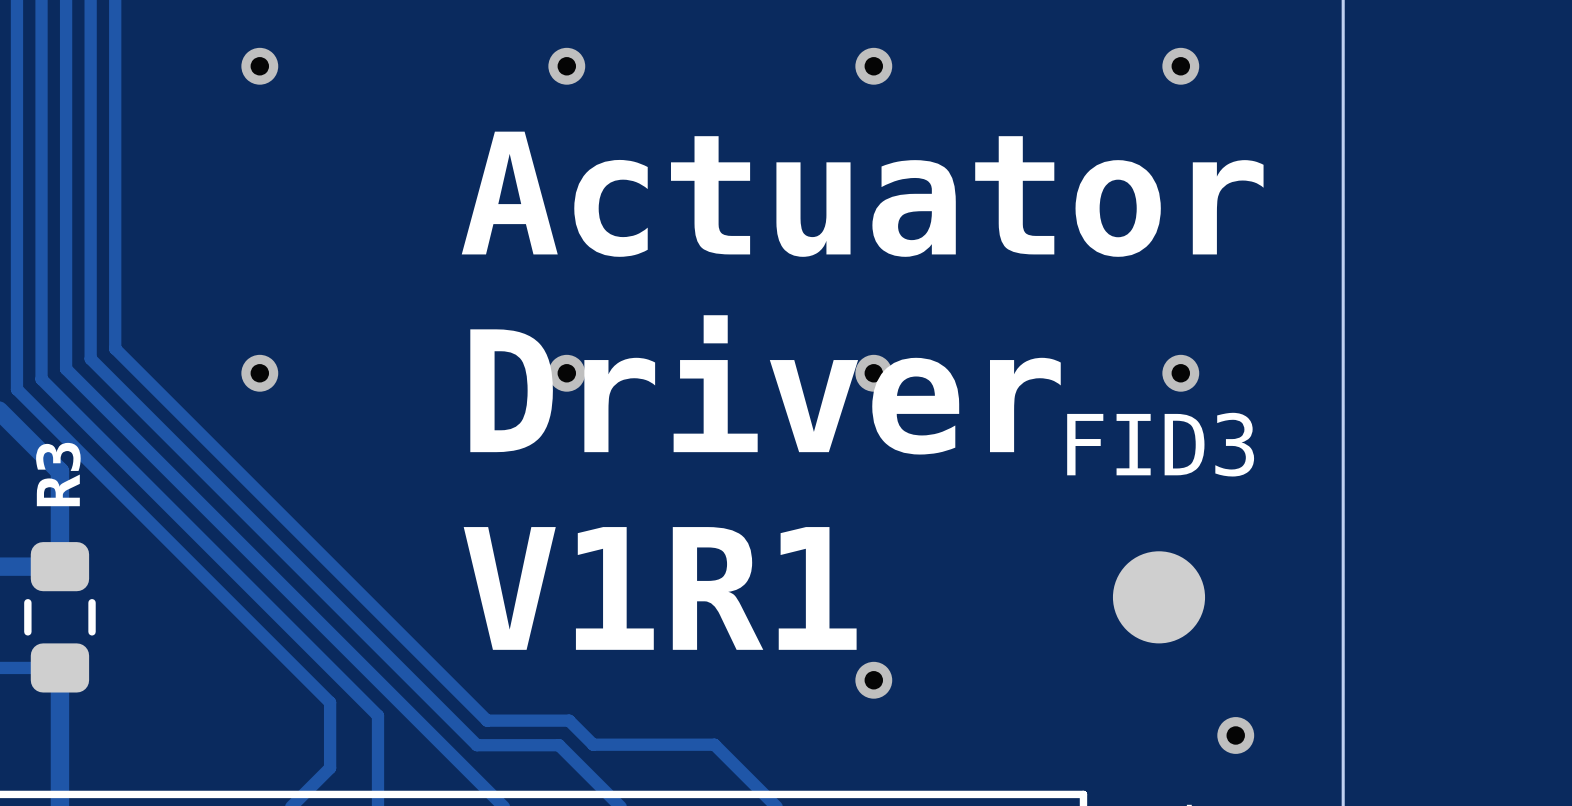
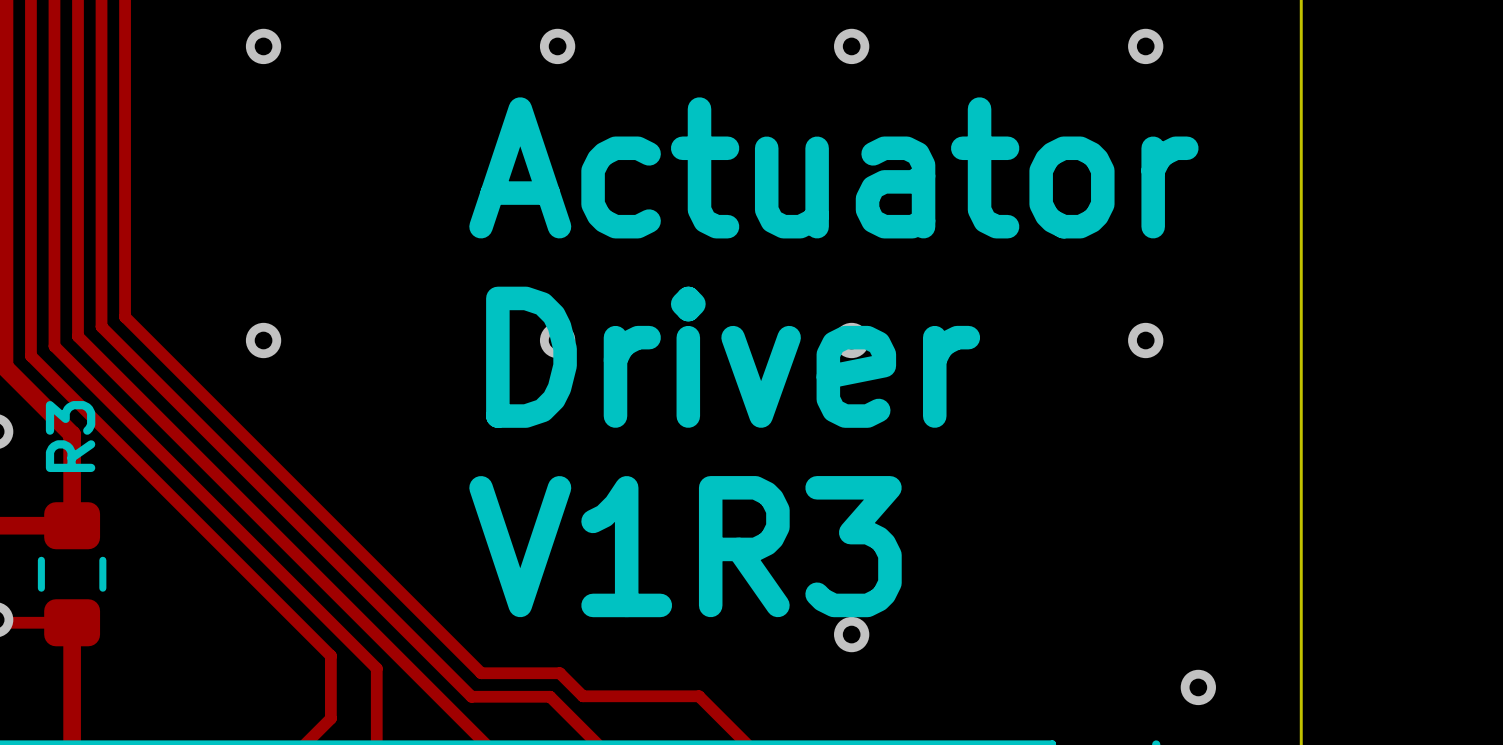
text: V1R1 (660, 588) -> V1R3 (685, 546)
FID3: (1159, 597) -> none

